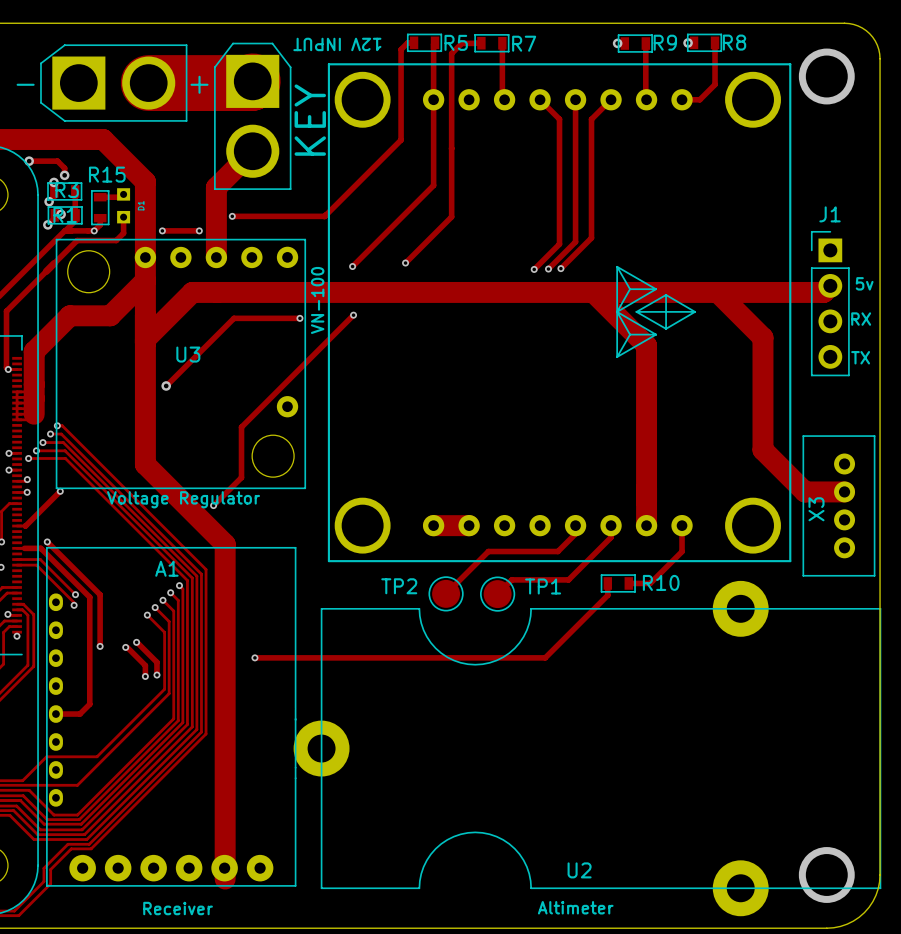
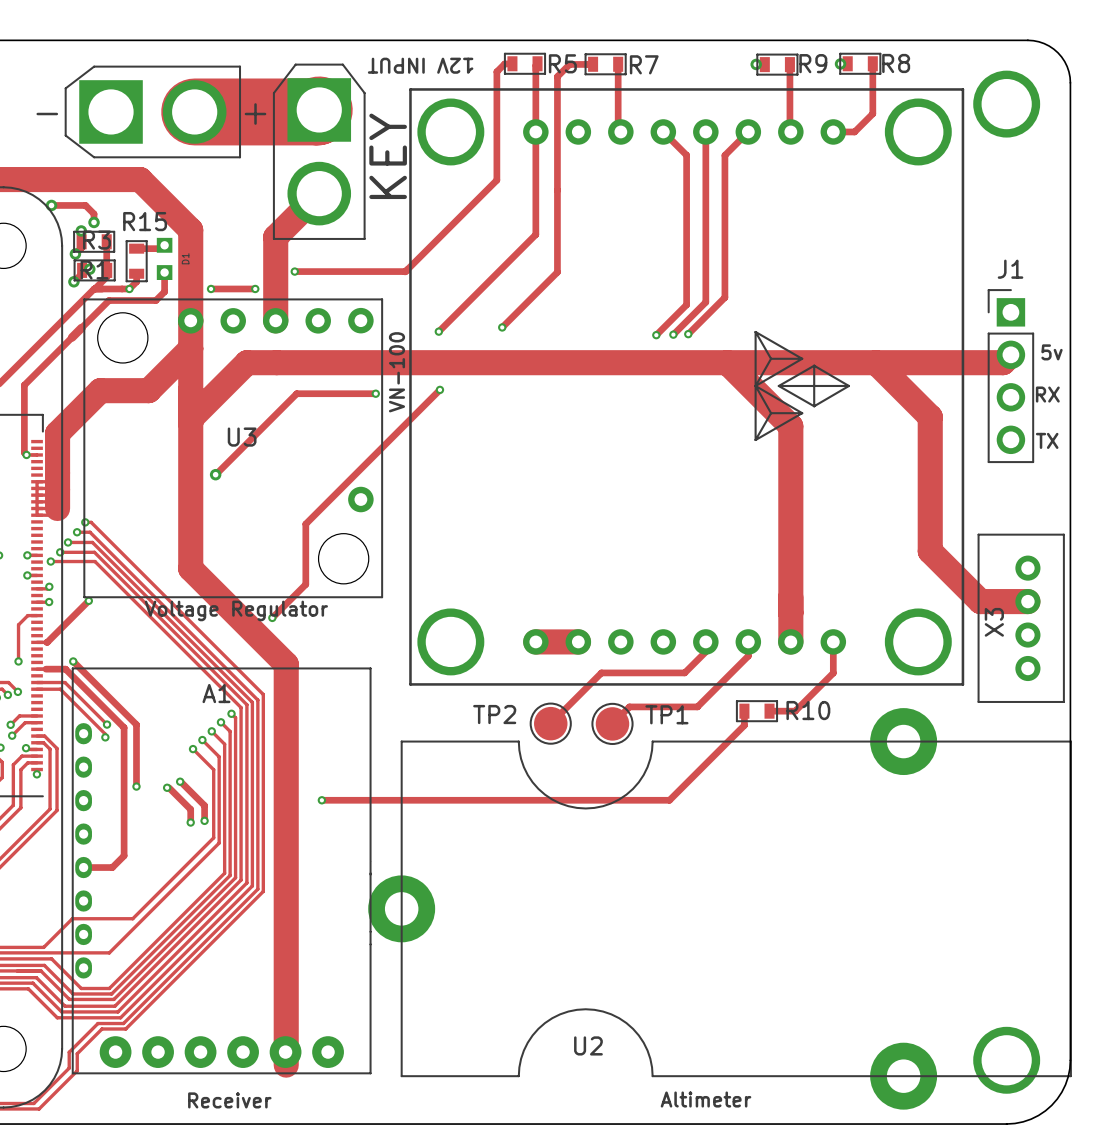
U2 name position: U2 (579, 870) -> U2 (588, 1045)

